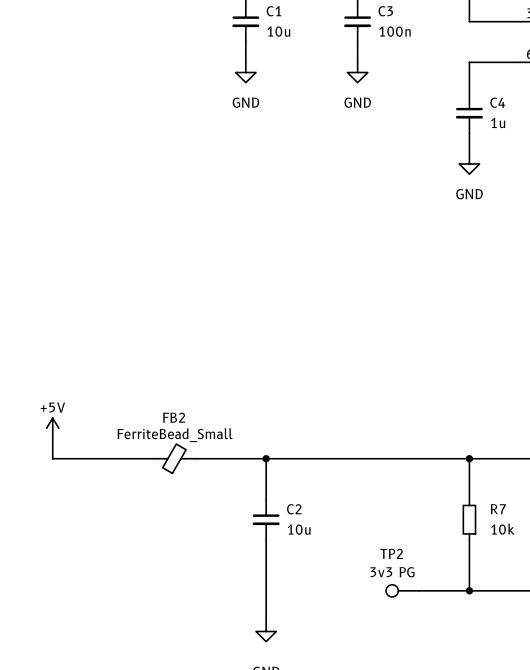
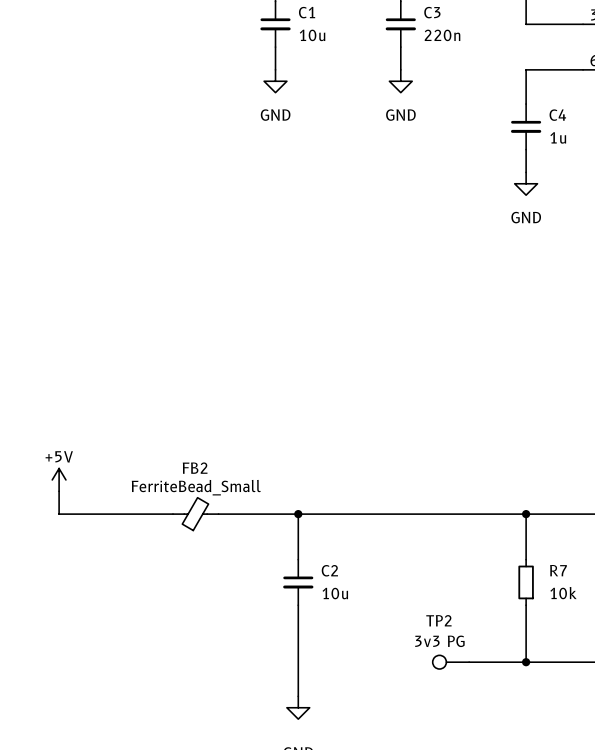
C3 value: 100n (395, 31) -> 220n (442, 35)

